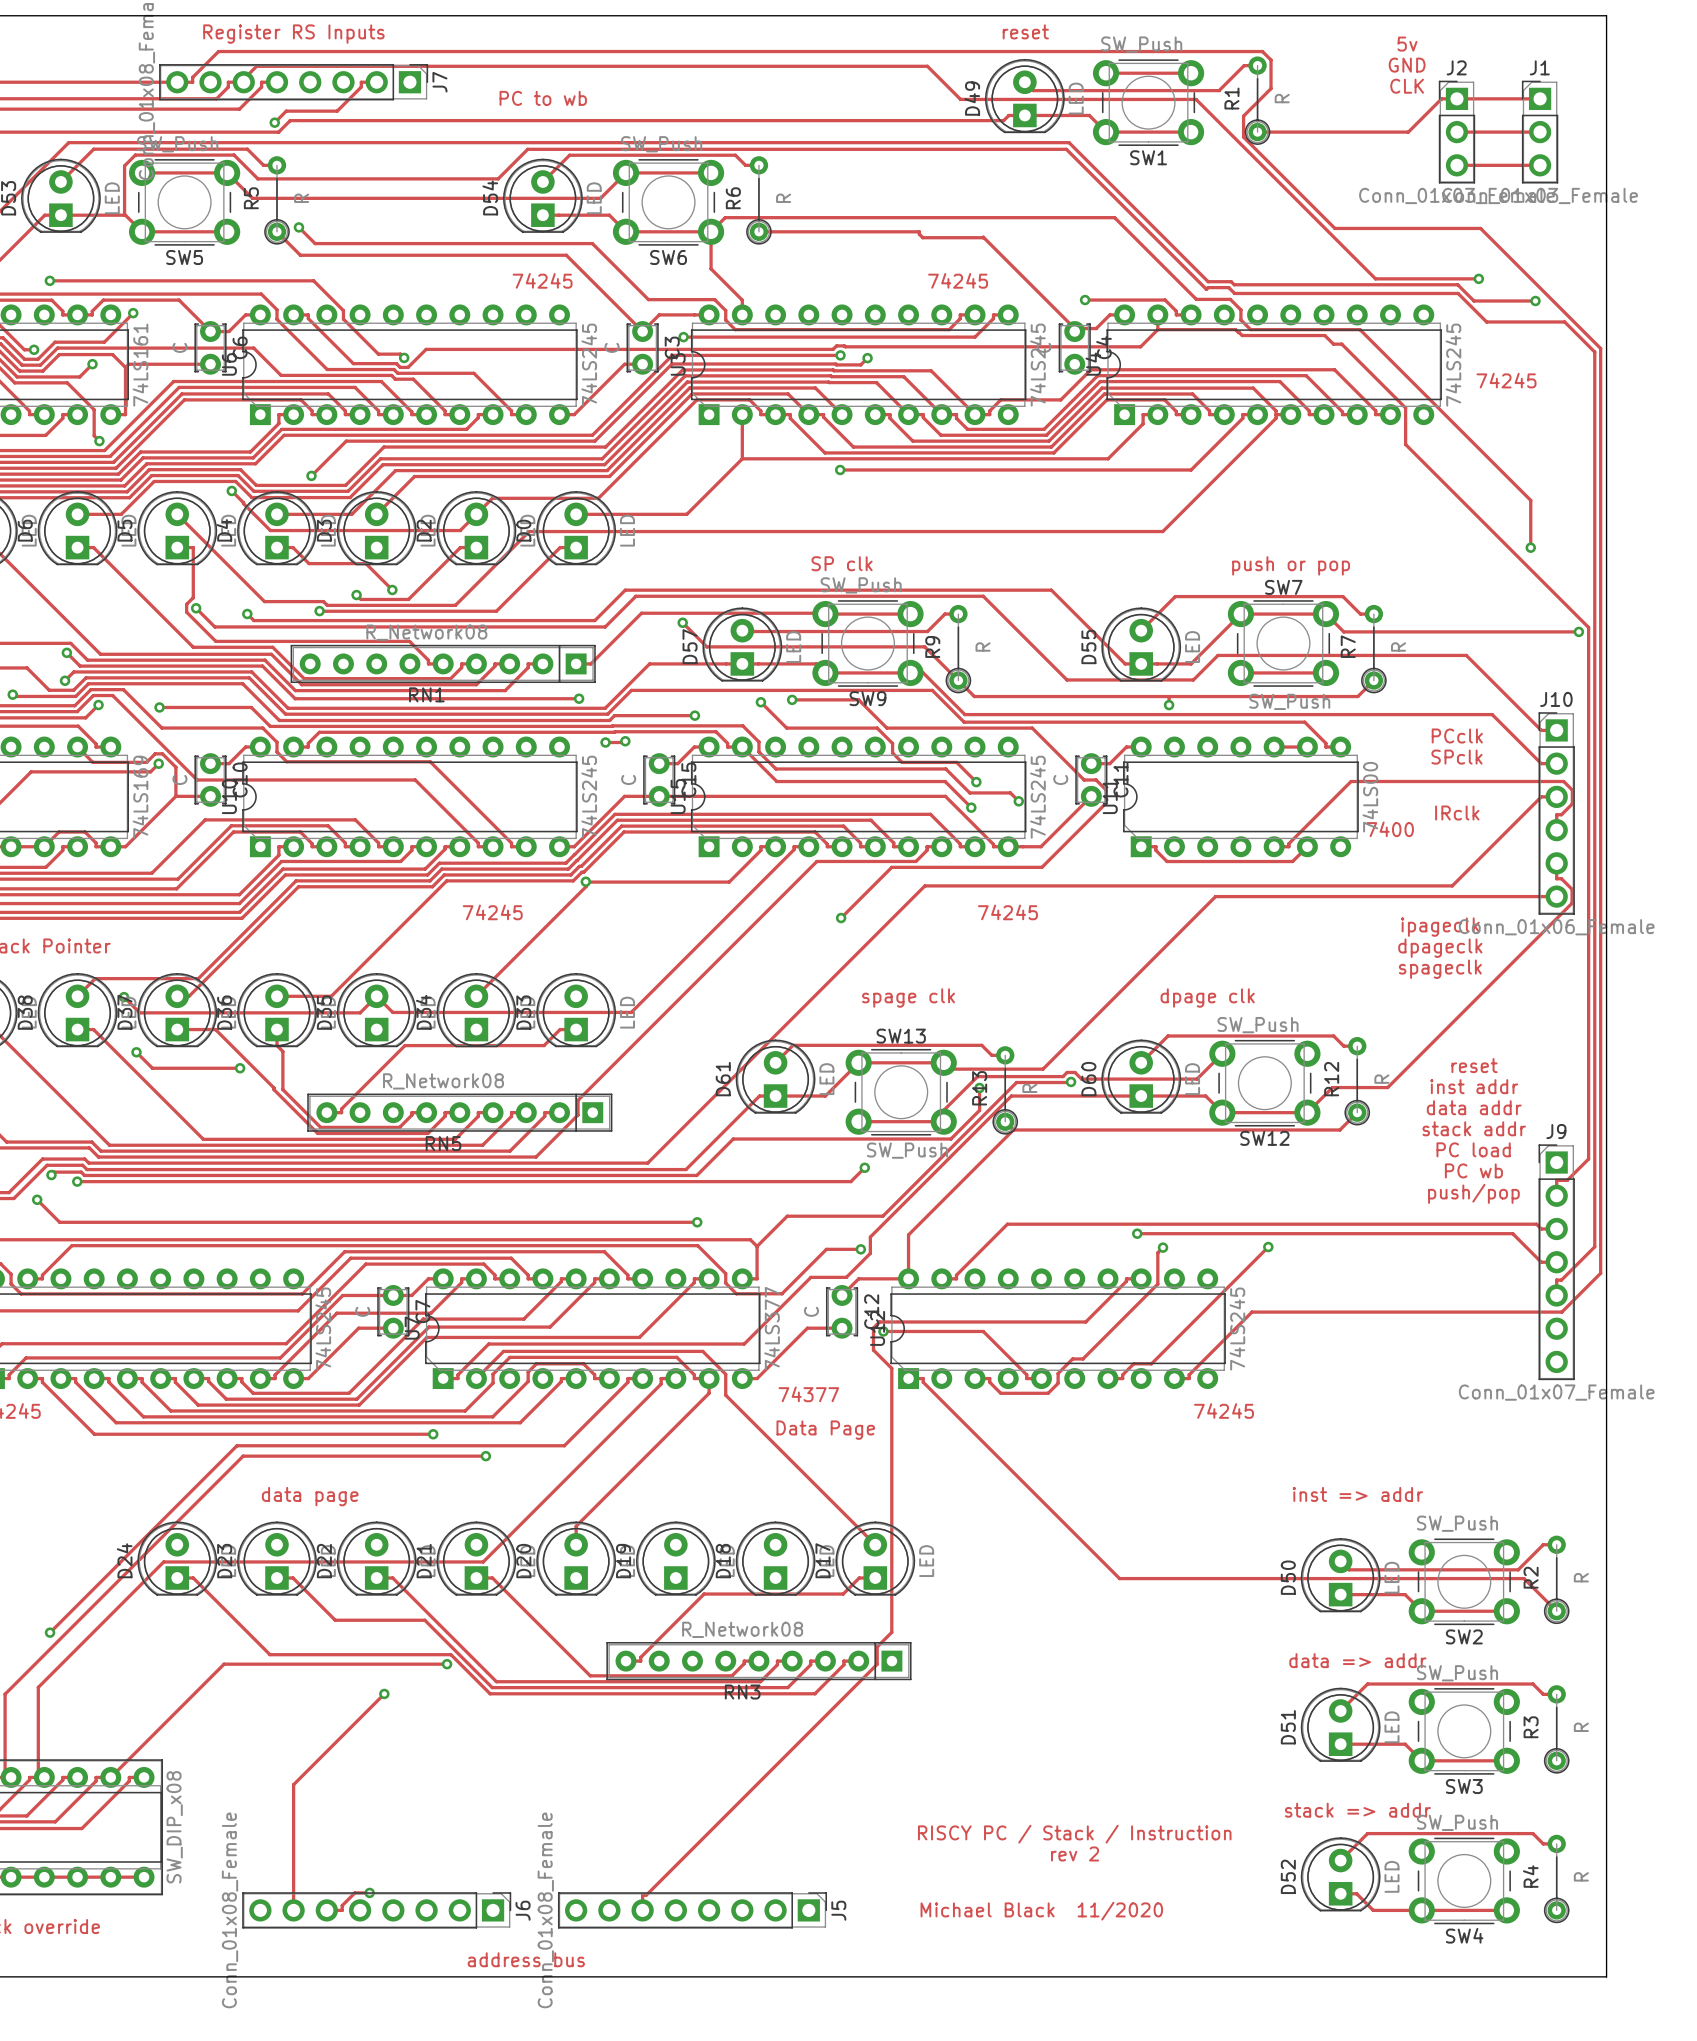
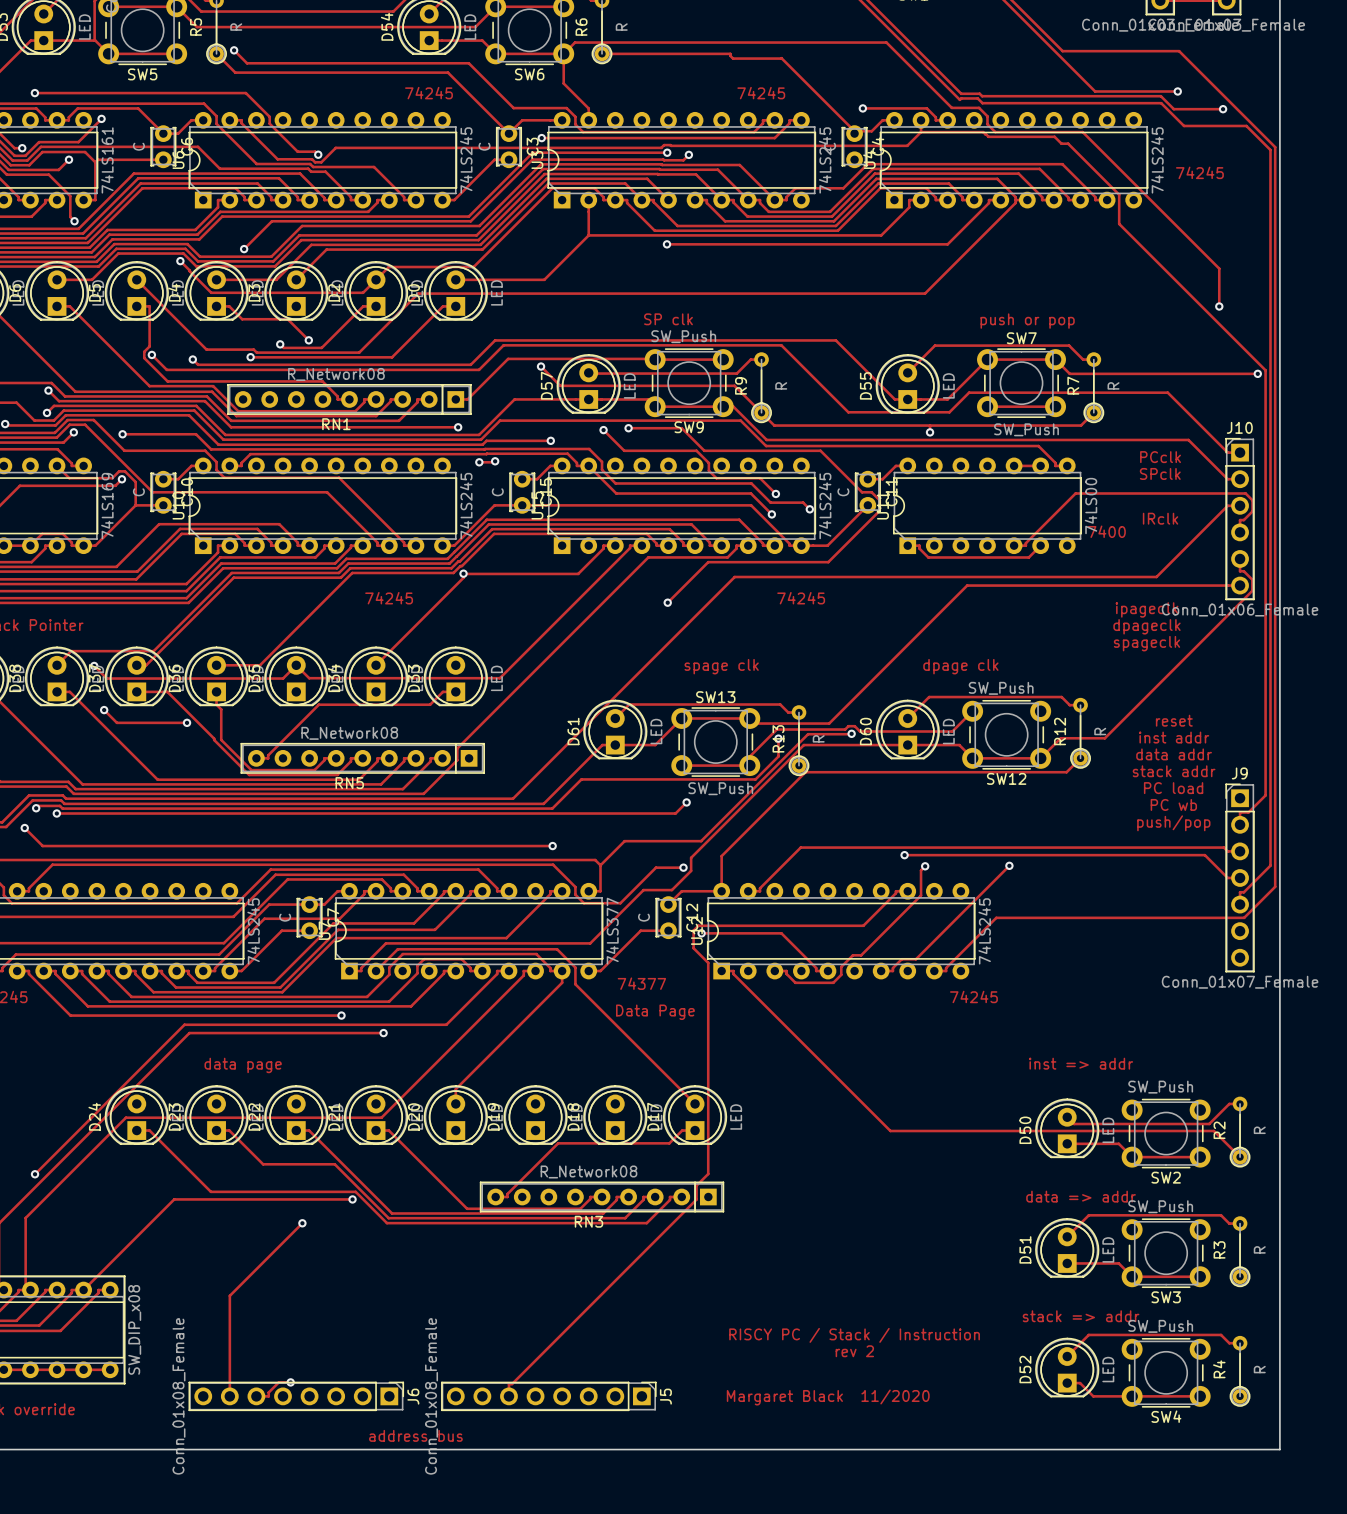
text: Michael Black 11/2020 (1041, 1911) -> Margaret Black 11/2020 (828, 1397)

